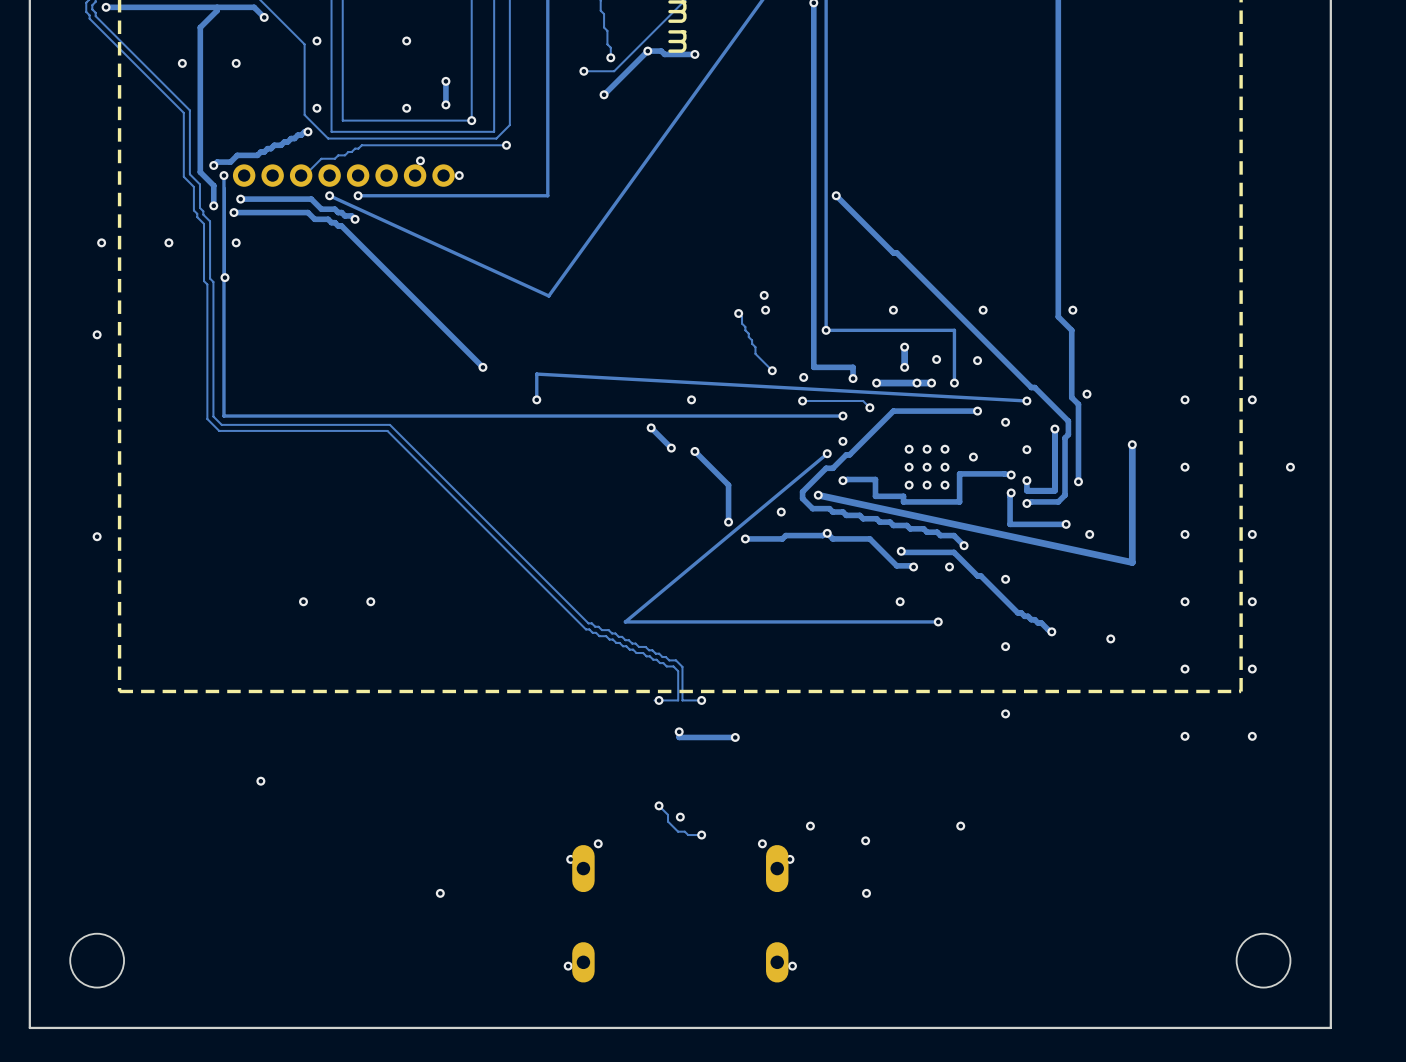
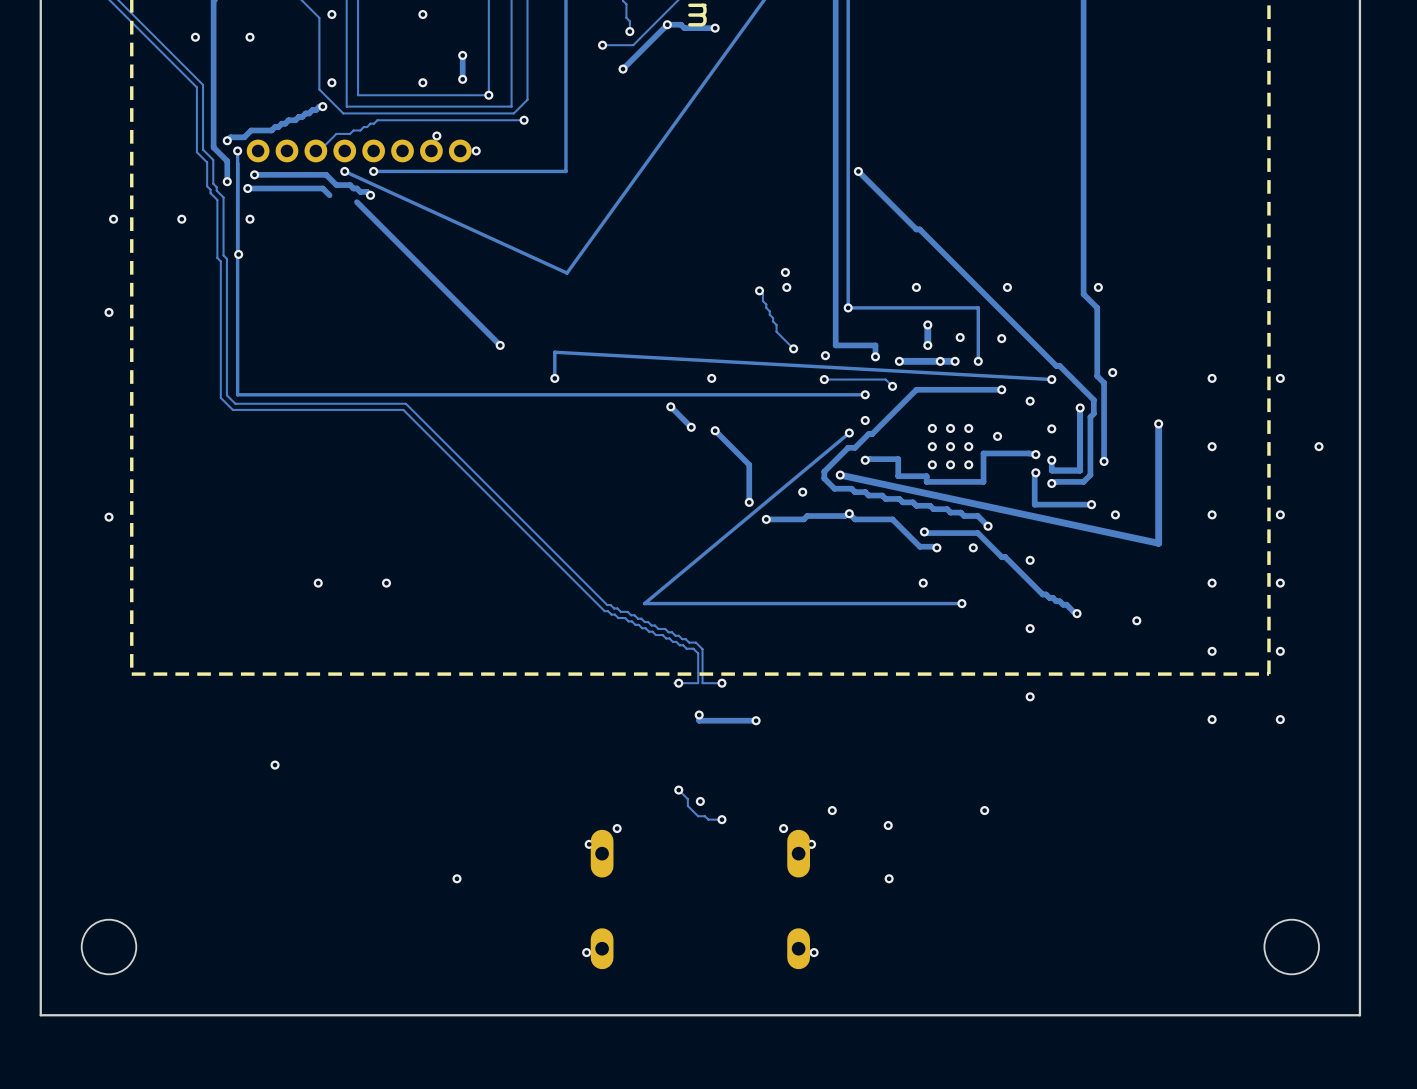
track: (314, 219) (328, 219) (338, 226) (341, 226) -> none

